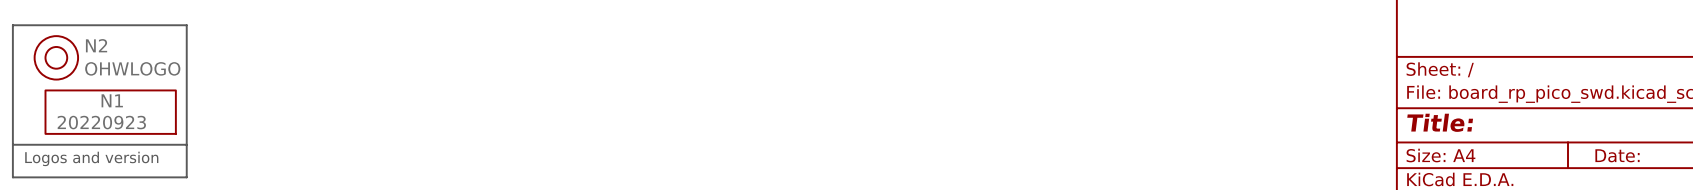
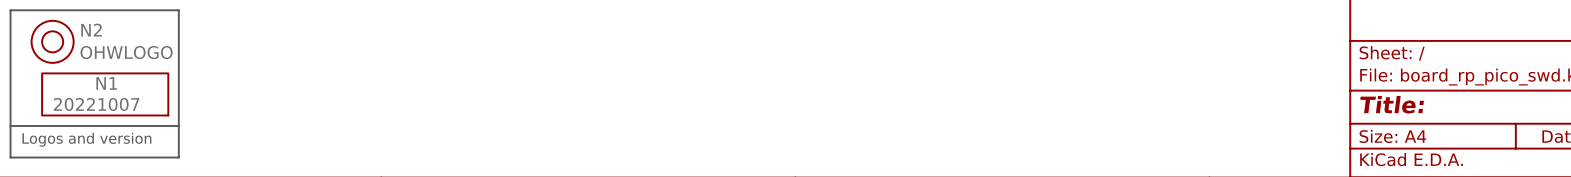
N1 value: 20220923 (101, 122) -> 20221007 (96, 104)

